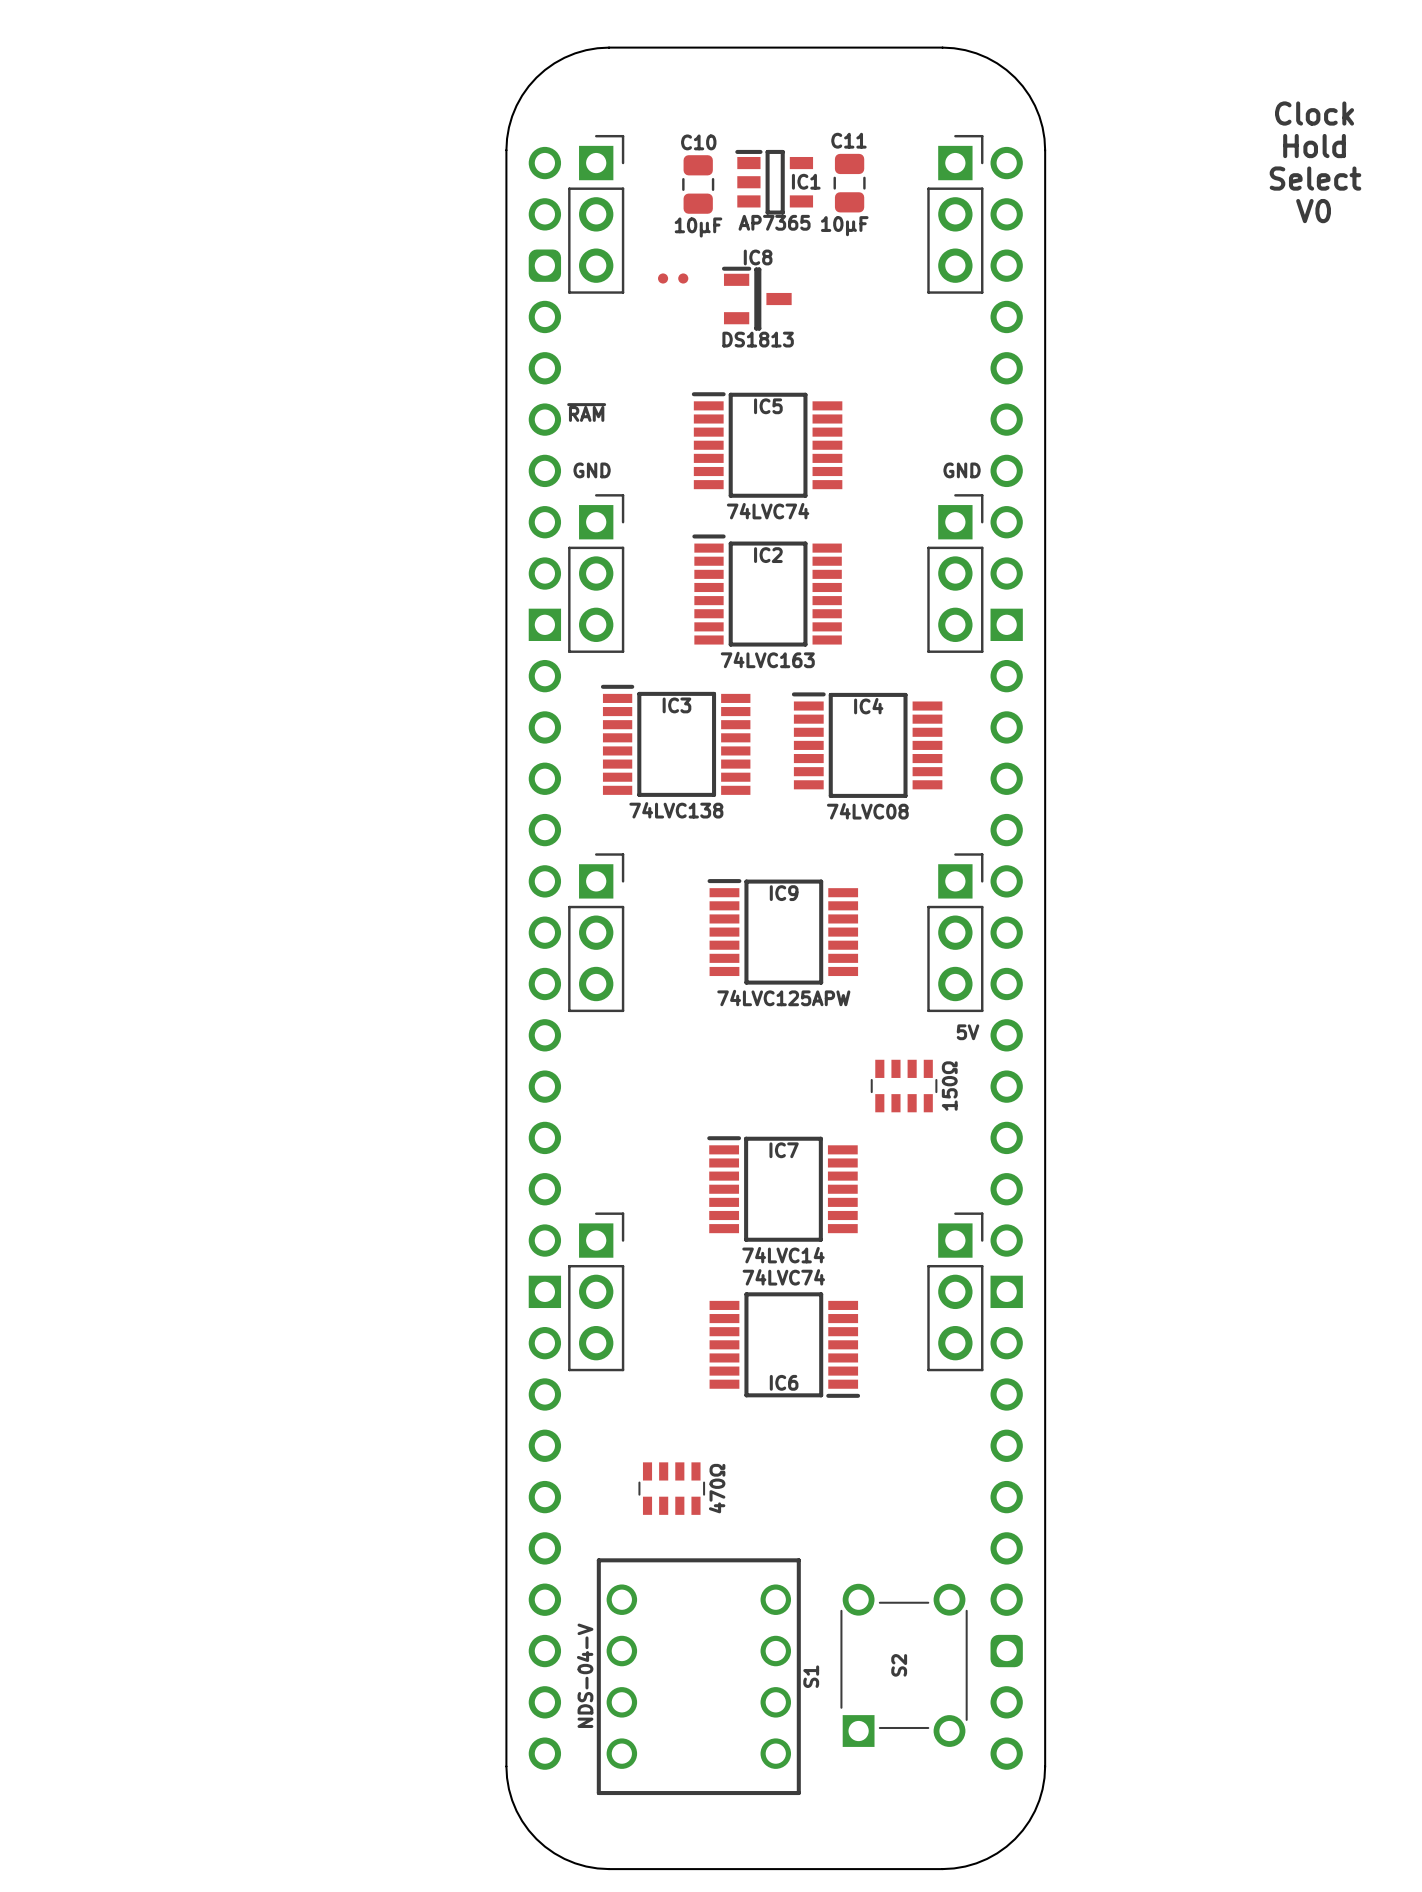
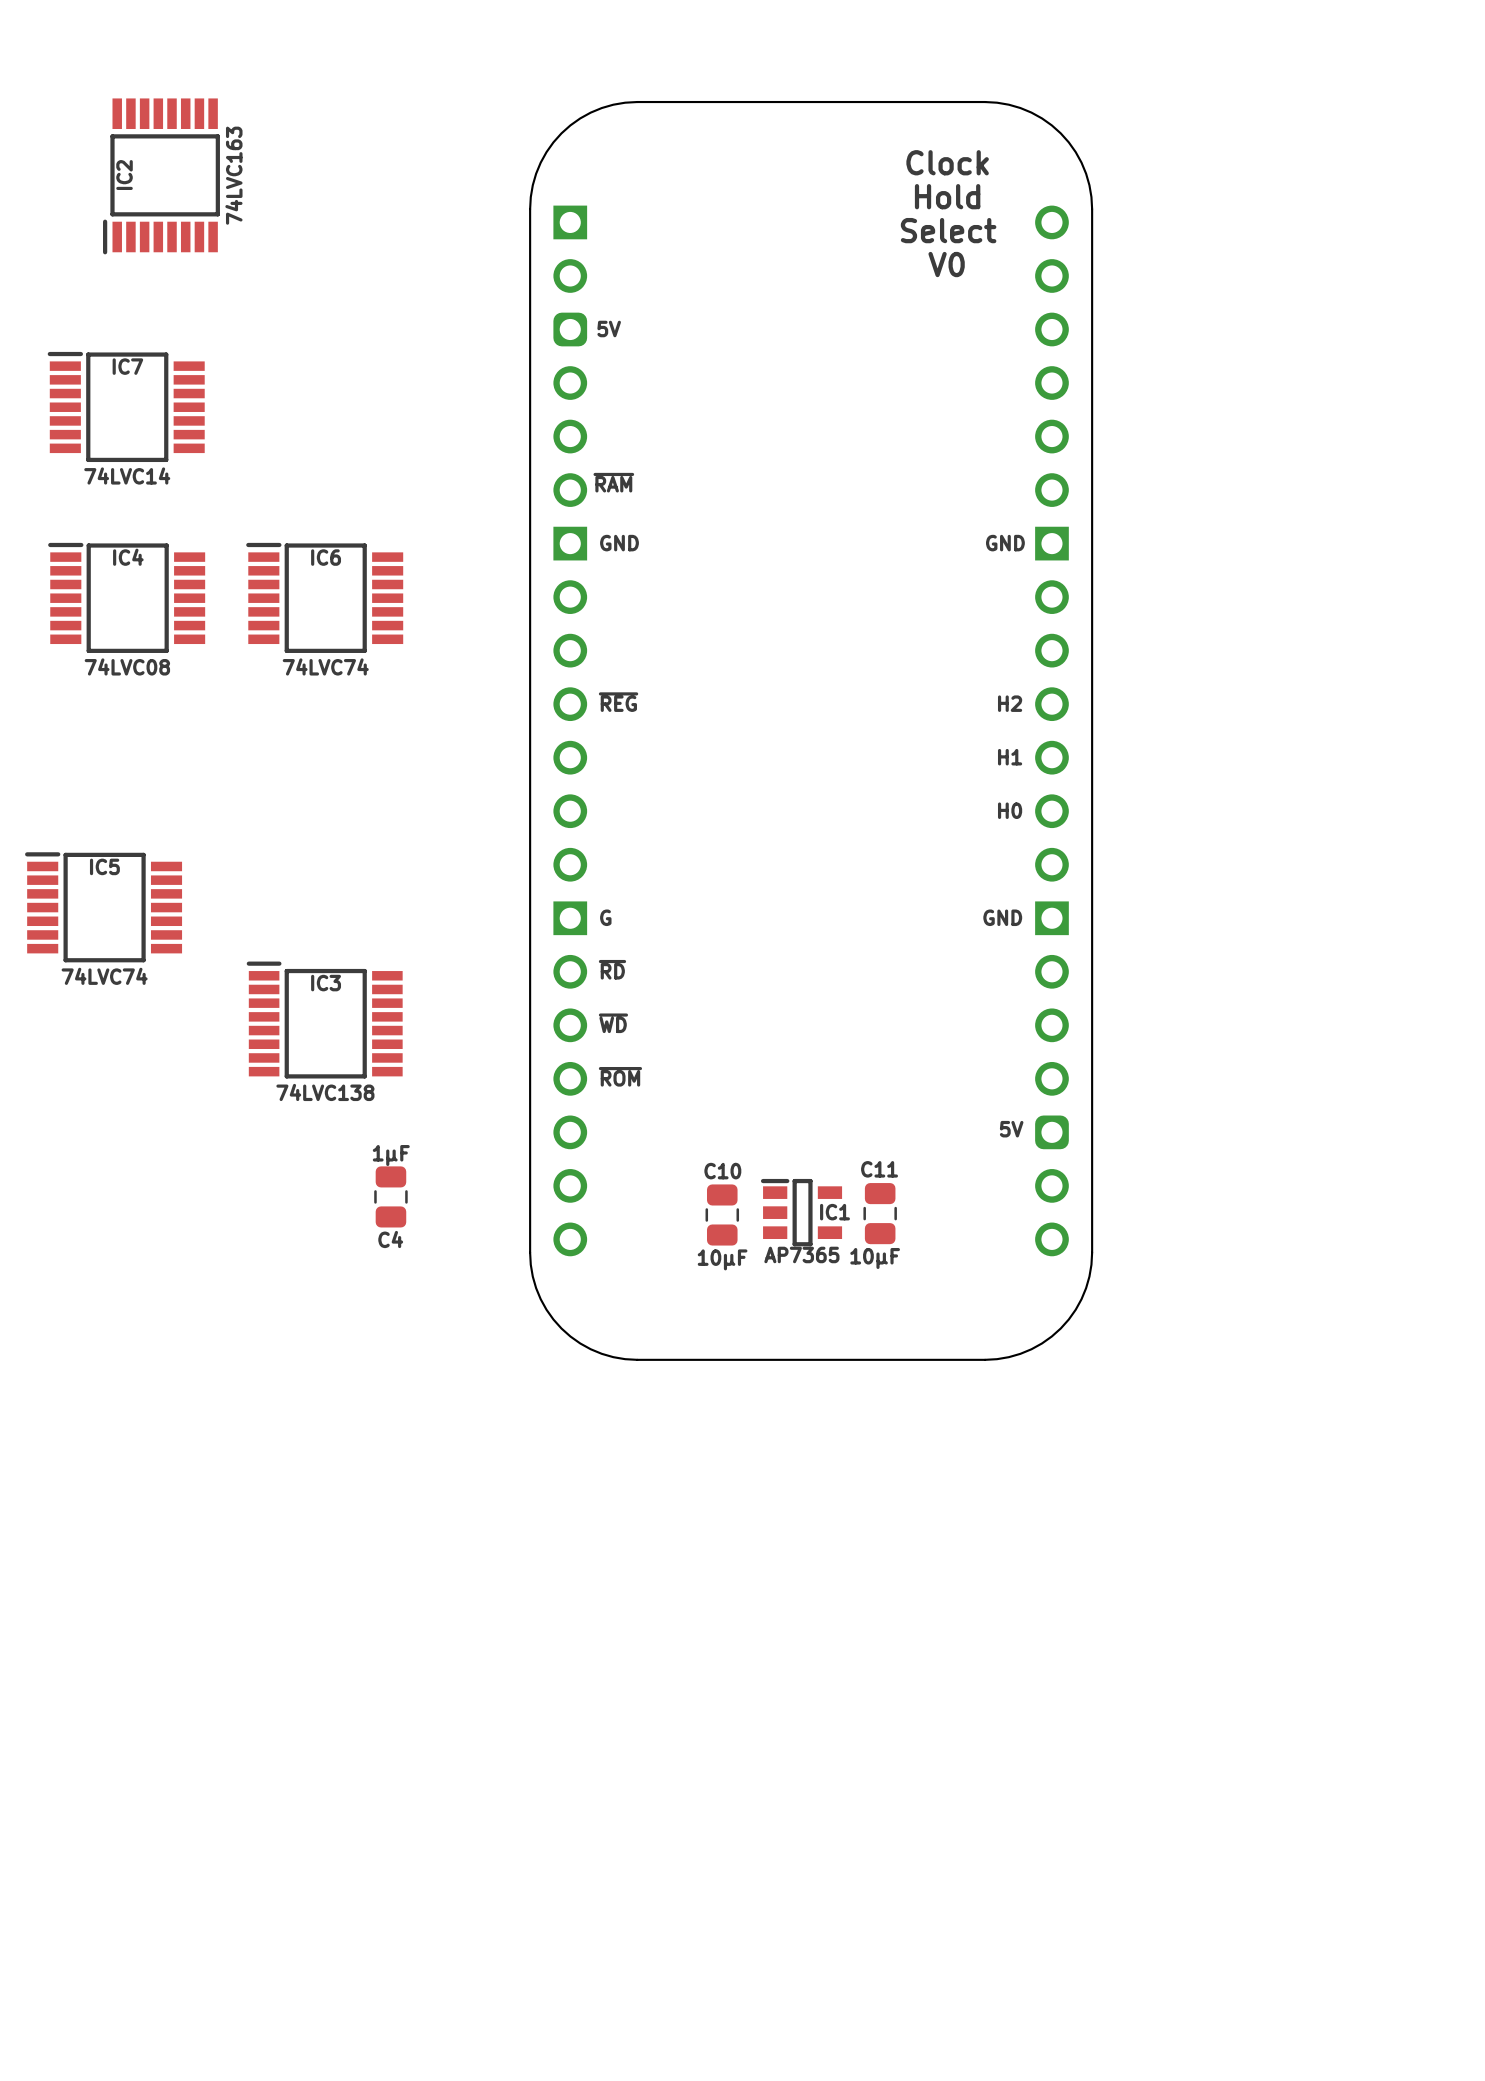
text position: Clock (1314, 113) -> Clock (947, 162)
text position: Hold (1314, 146) -> Hold (947, 196)
text position: Select (1315, 178) -> Select (948, 230)
IC1 position: (774, 182) -> (801, 1212)
C11 position: (849, 183) -> (880, 1213)
C10 position: (698, 184) -> (722, 1214)
text position: V0 (1313, 211) -> V0 (946, 264)
part: (596, 214) -> none
part: (955, 214) -> none
text: none -> 5V (609, 329)
part: (673, 278) -> none
IC8: (756, 298) -> none
IC5 position: (767, 445) -> (103, 907)
part: (596, 573) -> none
part: (955, 573) -> none
IC2 rotation: 0° (767, 590) -> 90° counterclockwise (161, 176)
IC2 position: (767, 590) -> (161, 176)
text: none -> ~{REG} (618, 702)
text: none -> H2 (1010, 703)
part: none -> (811, 730)
text: none -> H1 (1010, 757)
text: none -> H0 (1010, 810)
IC3 position: (675, 740) -> (324, 1020)
IC4 position: (867, 745) -> (126, 597)
text: none -> G (605, 917)
text: none -> GND (1002, 917)
text: none -> ~{RD} (612, 969)
text: none -> ~{WD} (613, 1023)
IC9: (782, 931) -> none
part: (596, 932) -> none
part: (955, 932) -> none
part: (775, 958) -> none
text: none -> ~{ROM} (620, 1076)
part: (904, 1086) -> none
C4: none -> 1μF (390, 1196)
IC7 position: (782, 1188) -> (126, 406)
part: (596, 1291) -> none
part: (955, 1291) -> none
IC6 rotation: 0° (784, 1345) -> 180° (324, 597)
IC6 position: (784, 1345) -> (324, 597)
part: (671, 1488) -> none
S2: (904, 1665) -> none
S1: NDS-04-V (698, 1676) -> none

